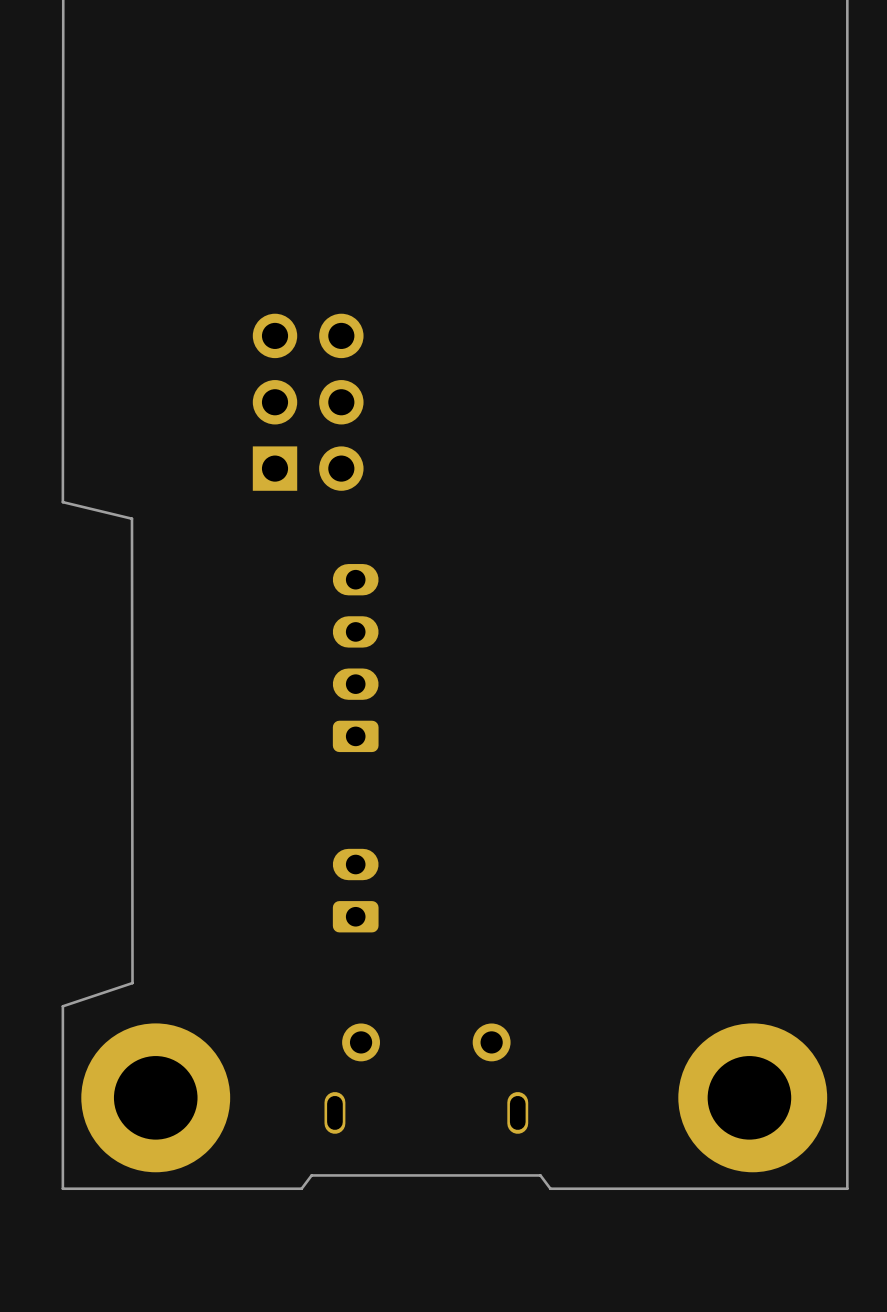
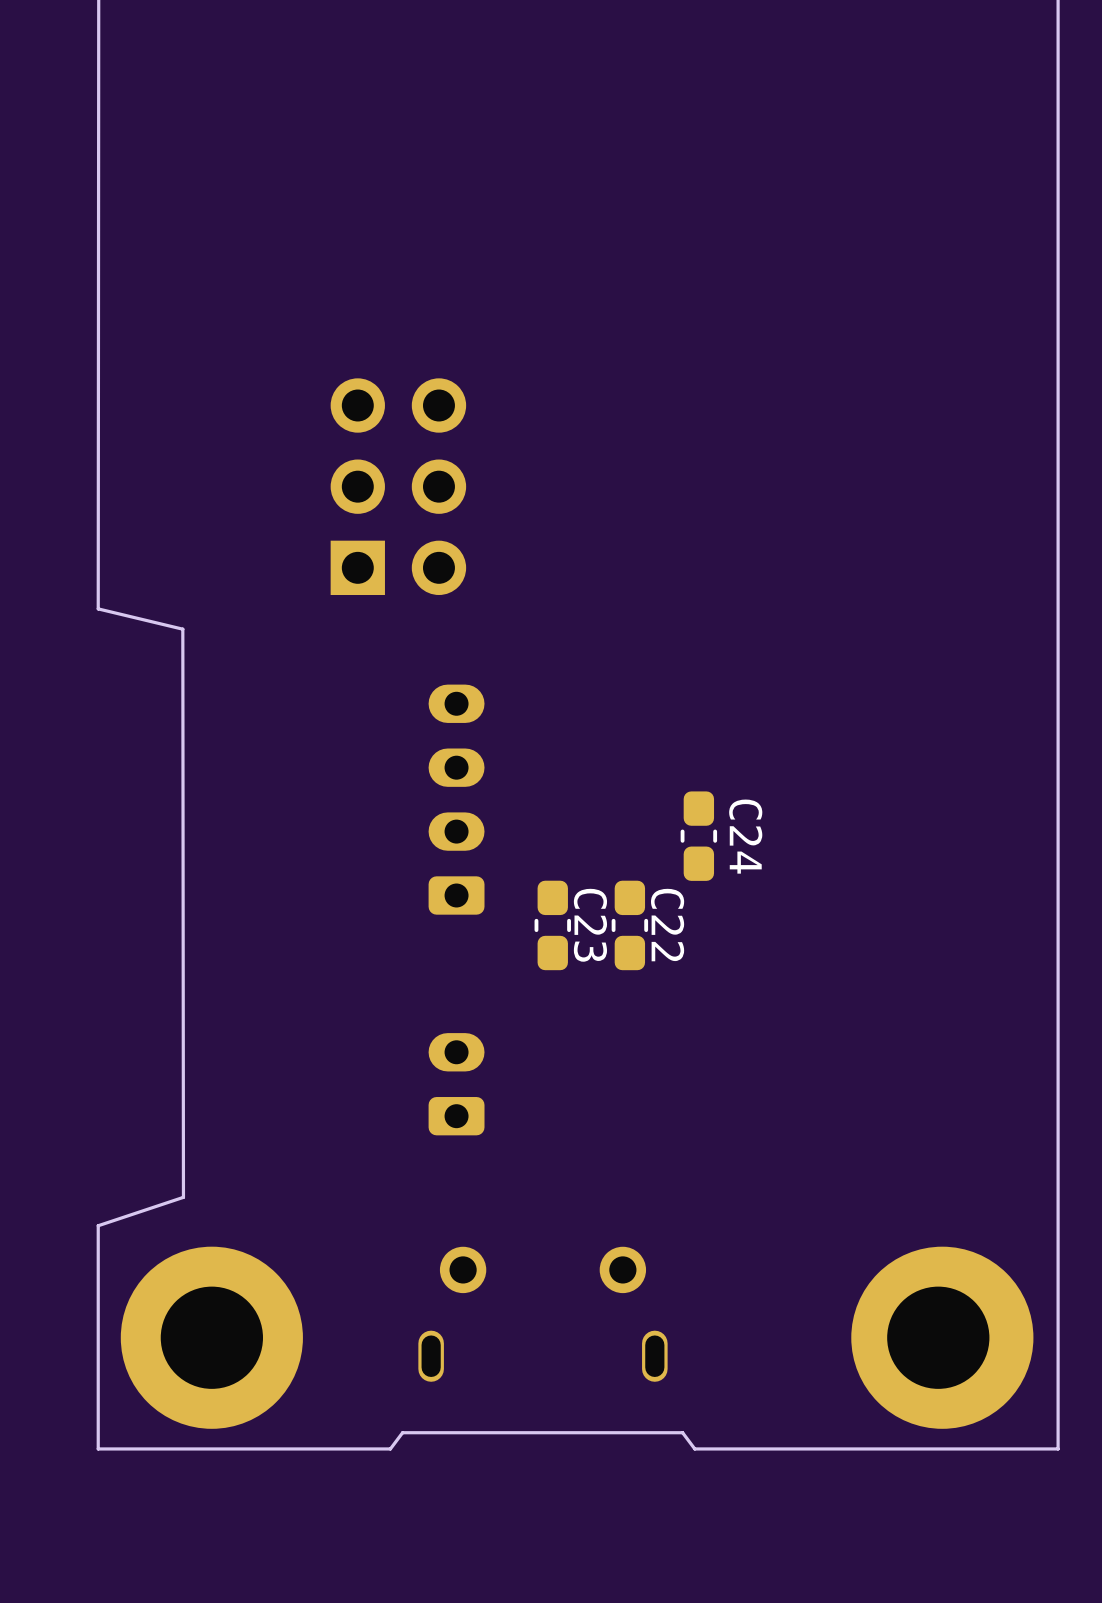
C24: none -> (698, 836)
C23: none -> (552, 925)
C22: none -> (629, 925)

